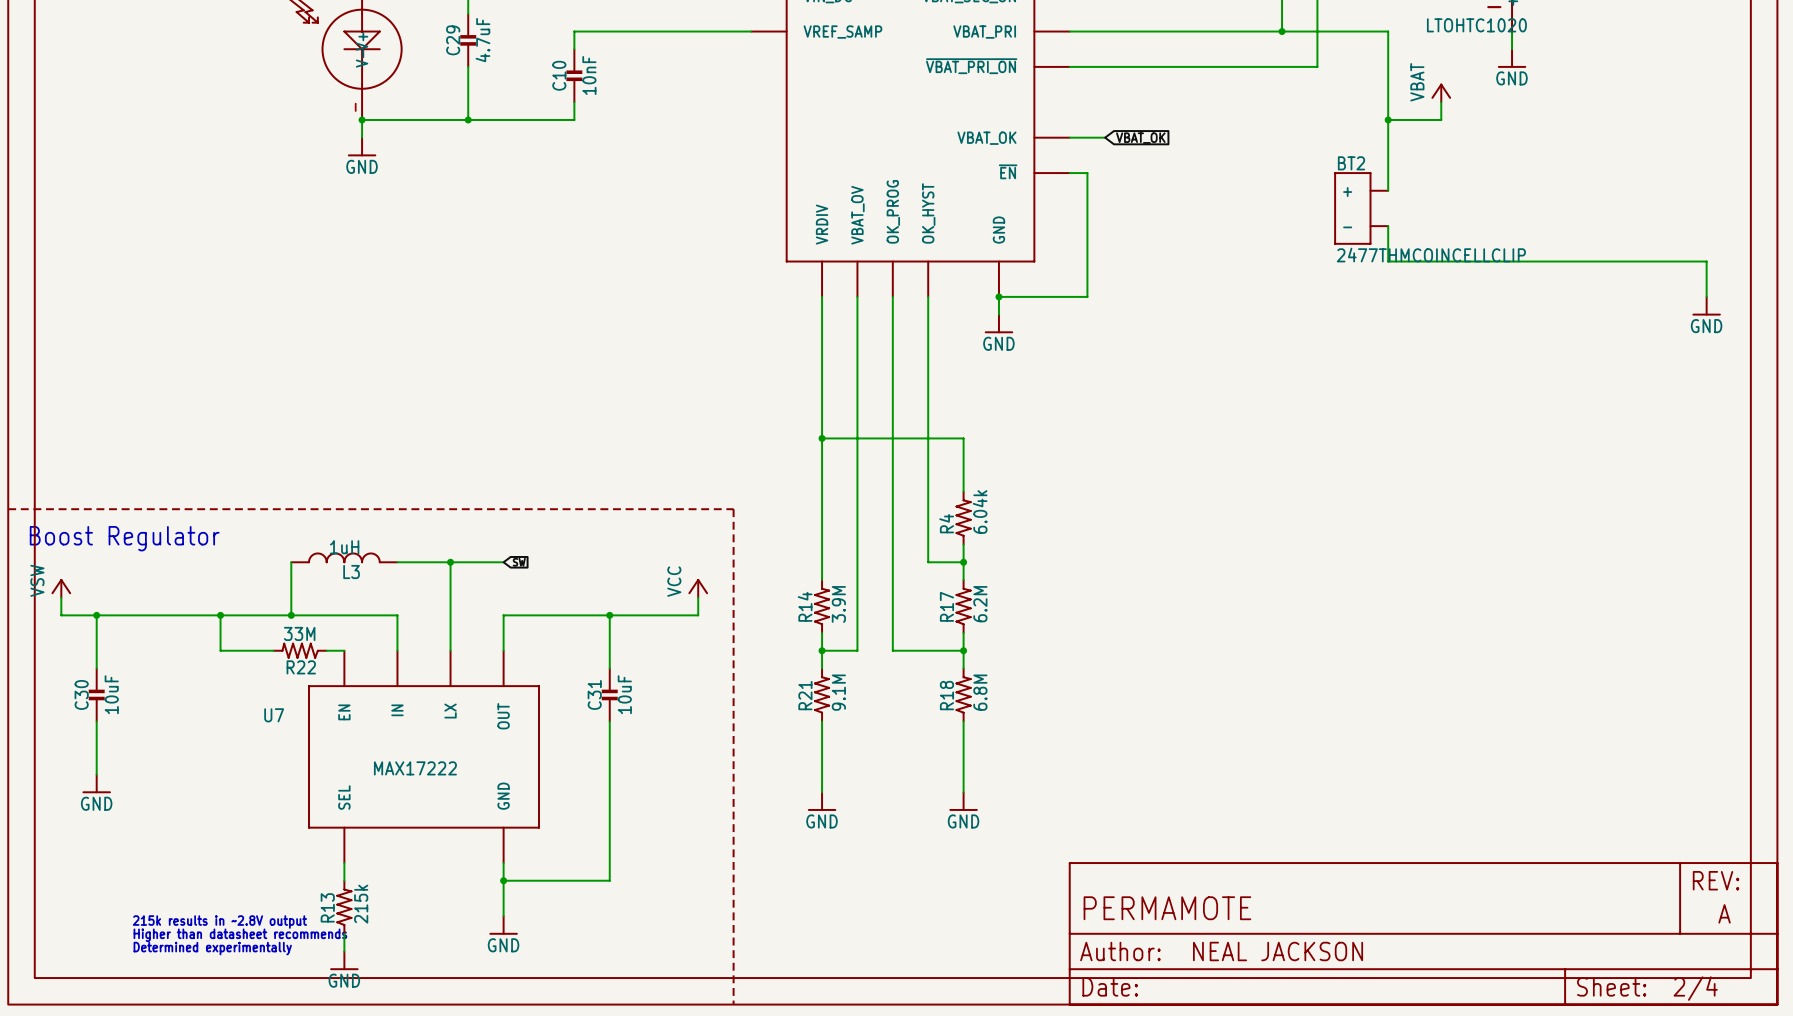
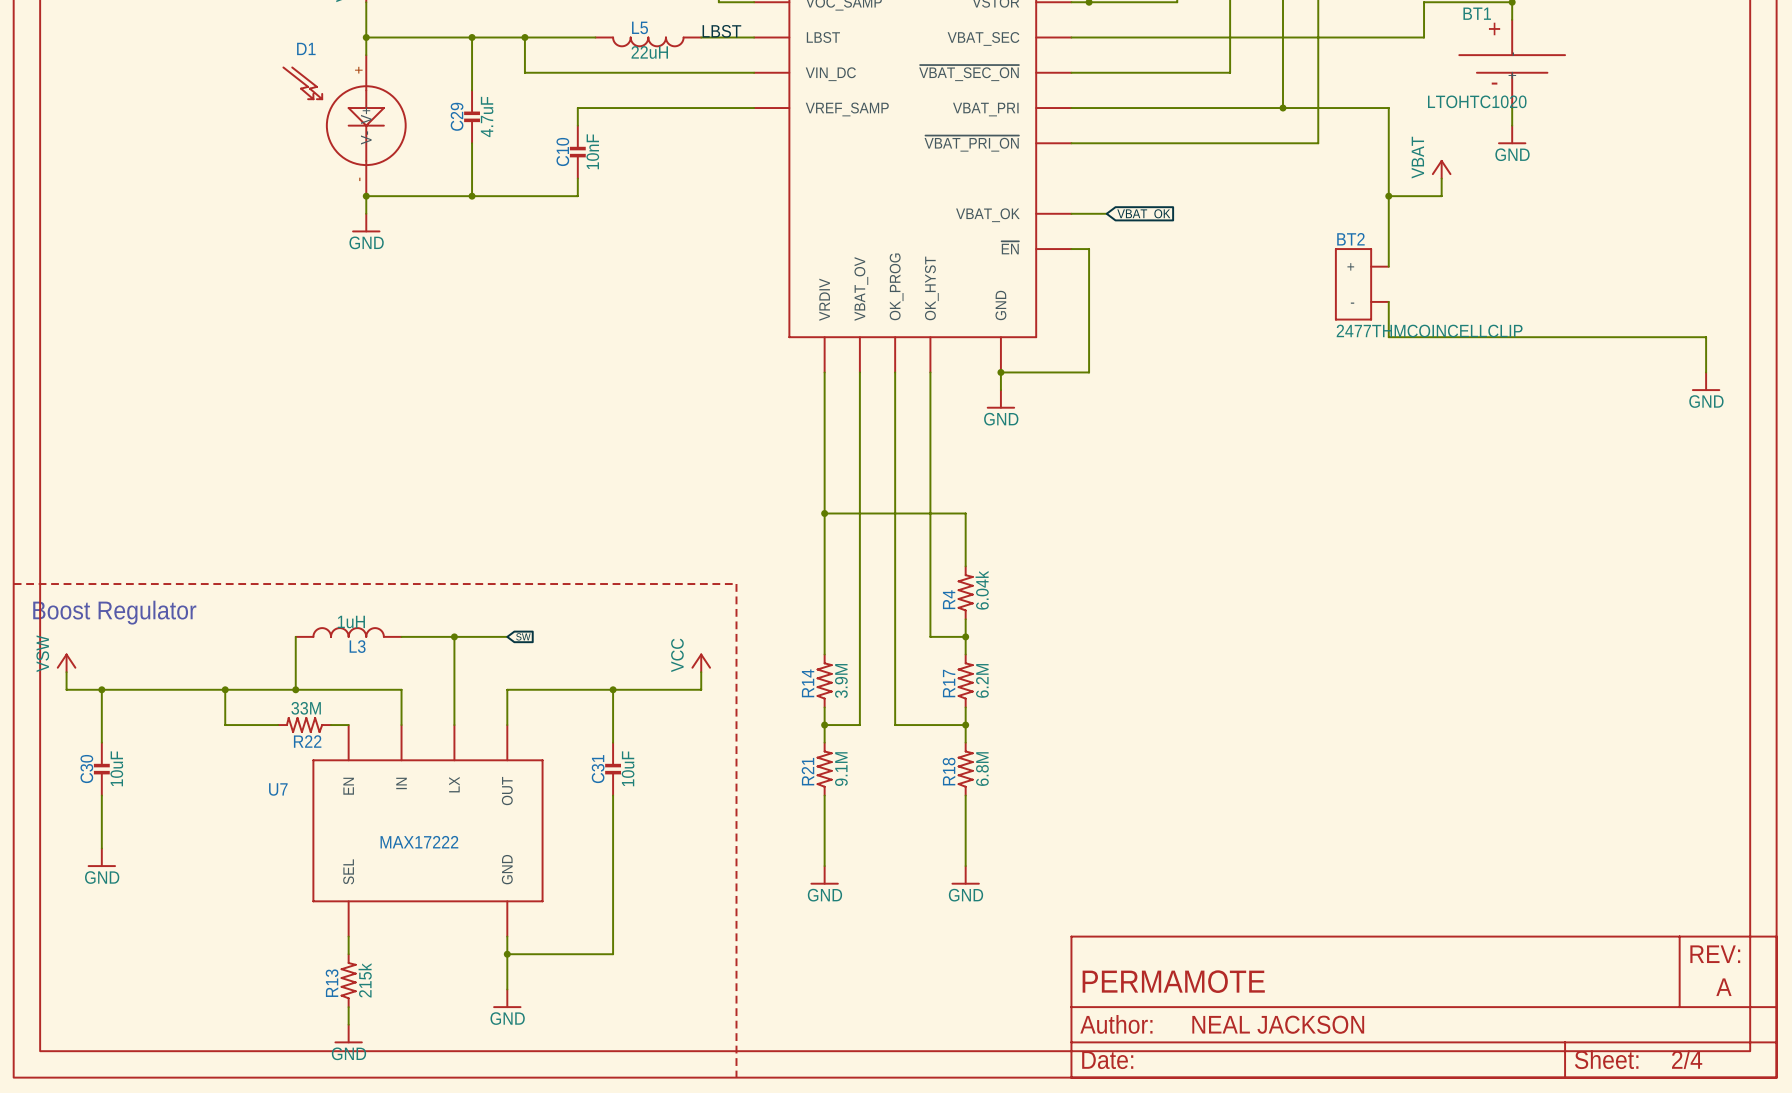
text: 215k results in ~2.8V output (219, 922) -> none
text: Higher than datasheet recommends (240, 935) -> none
text: Determined experimentally (212, 948) -> none

